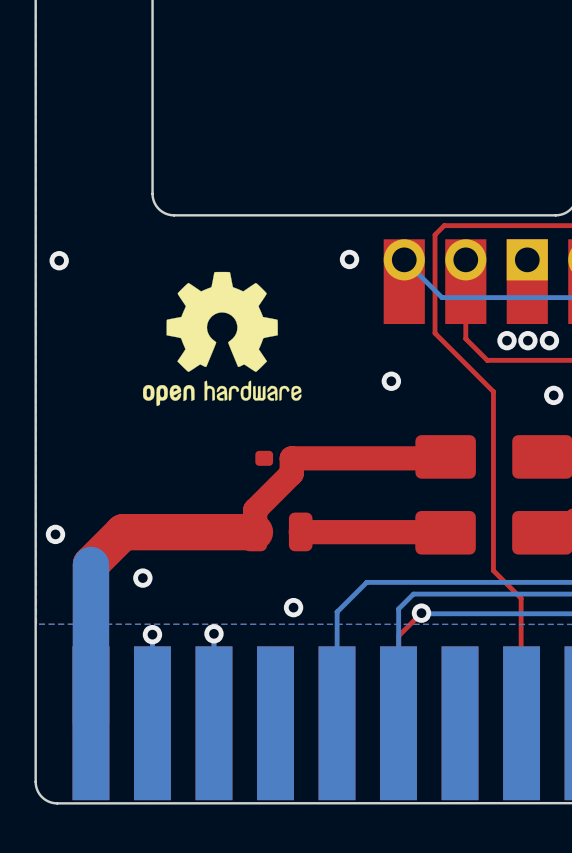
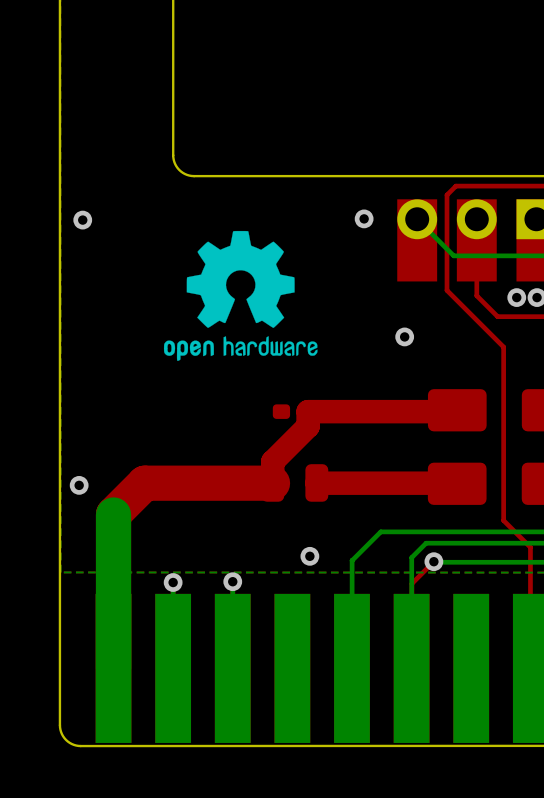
via: (142, 578) -> none

